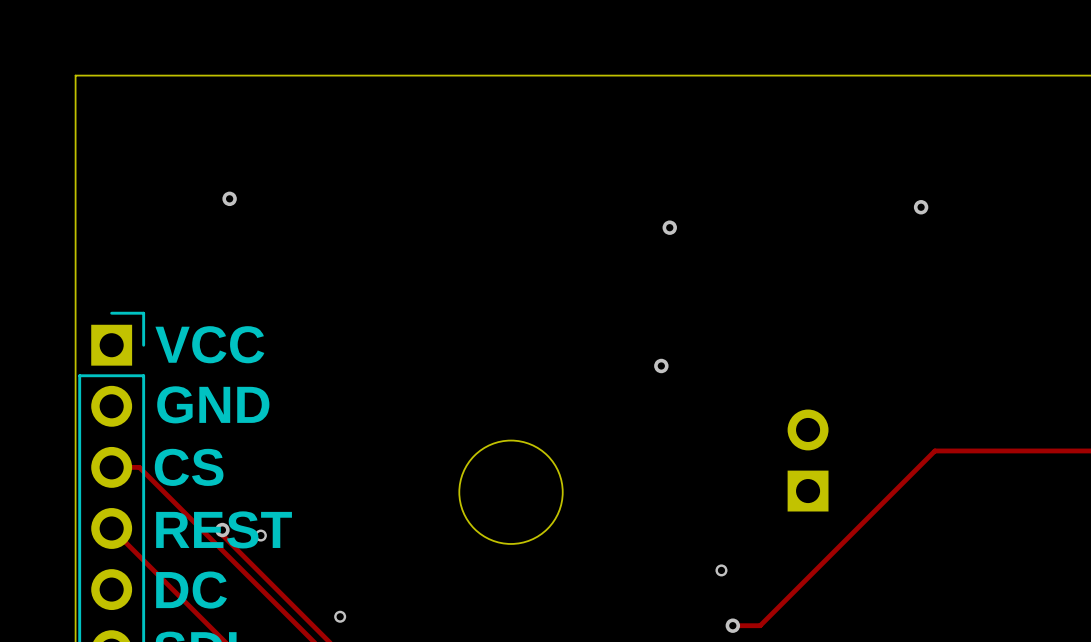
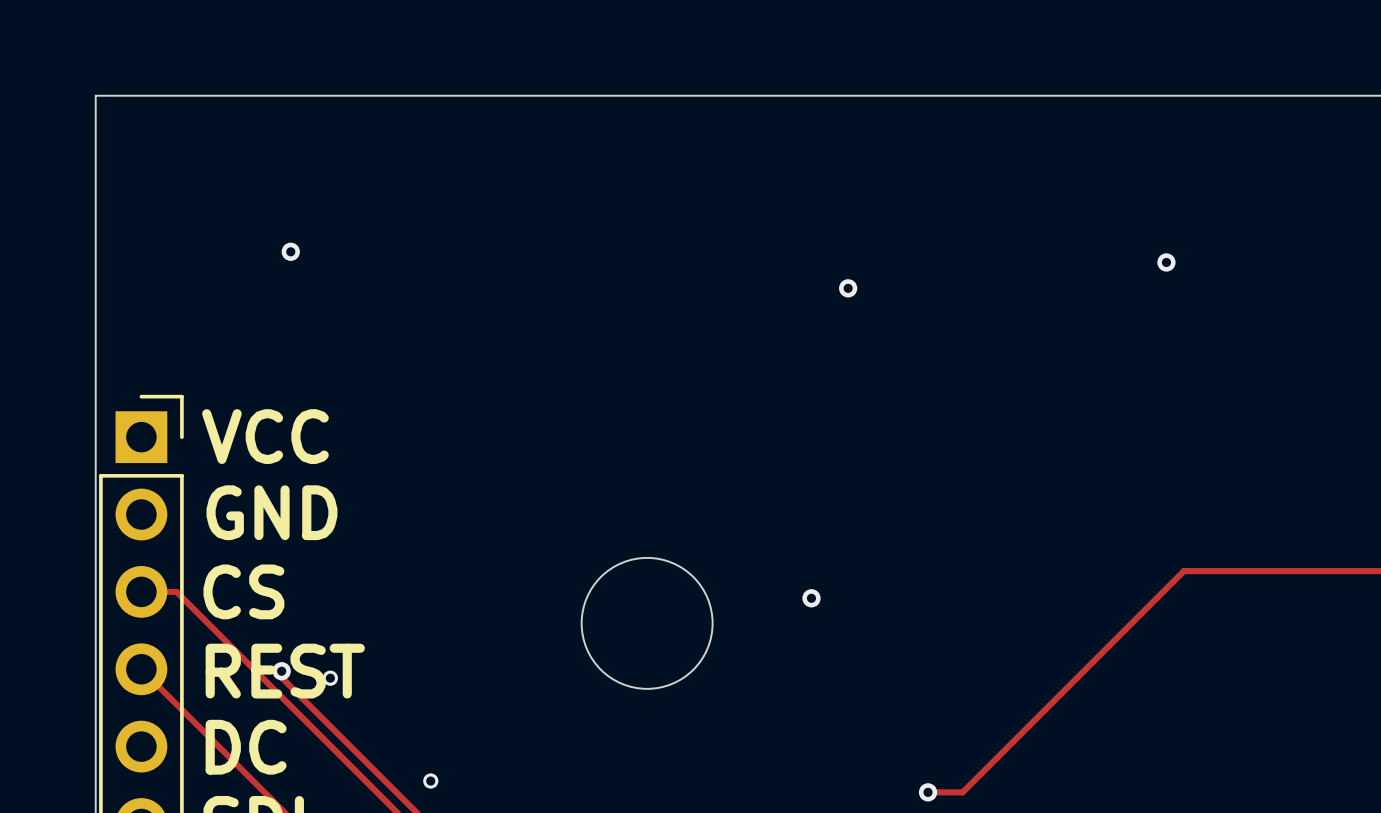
via position: (661, 365) -> (811, 598)
part: (808, 460) -> none
via: (721, 570) -> none

